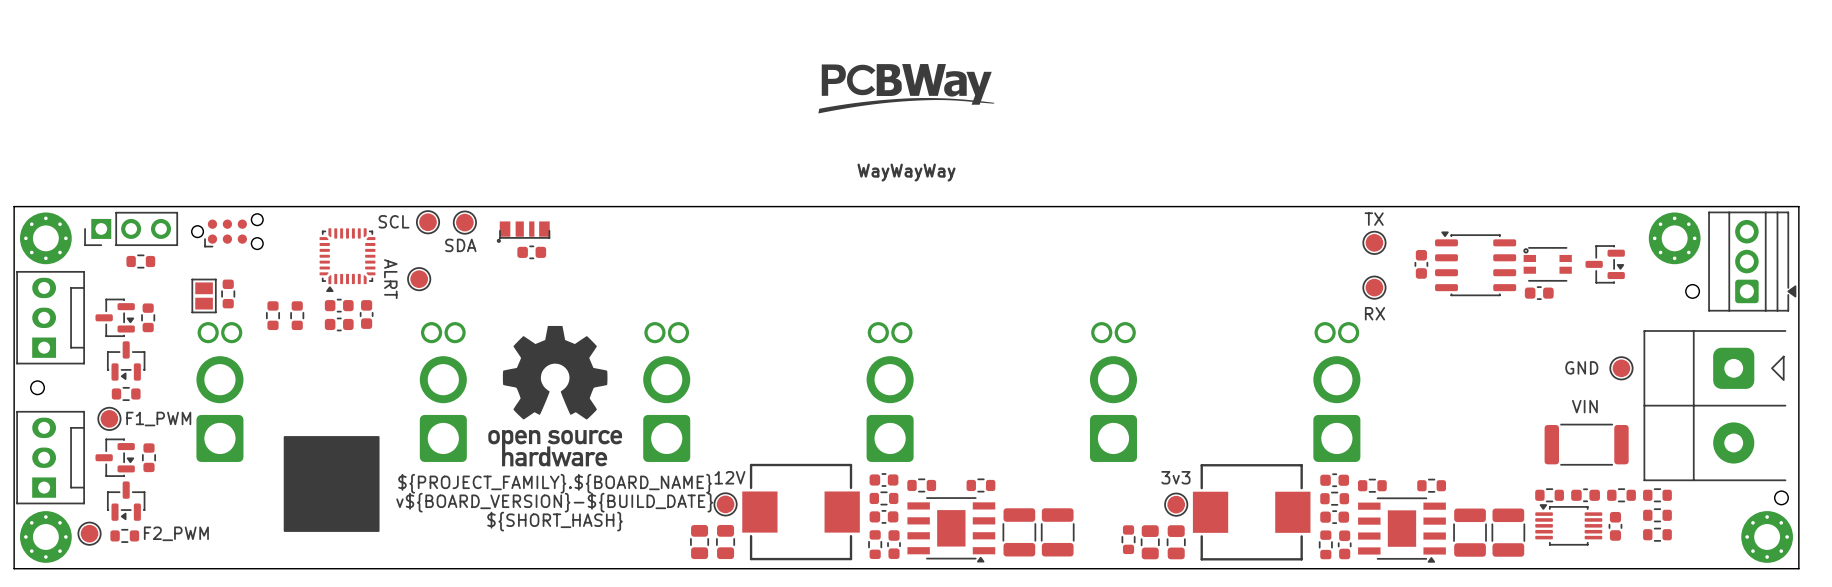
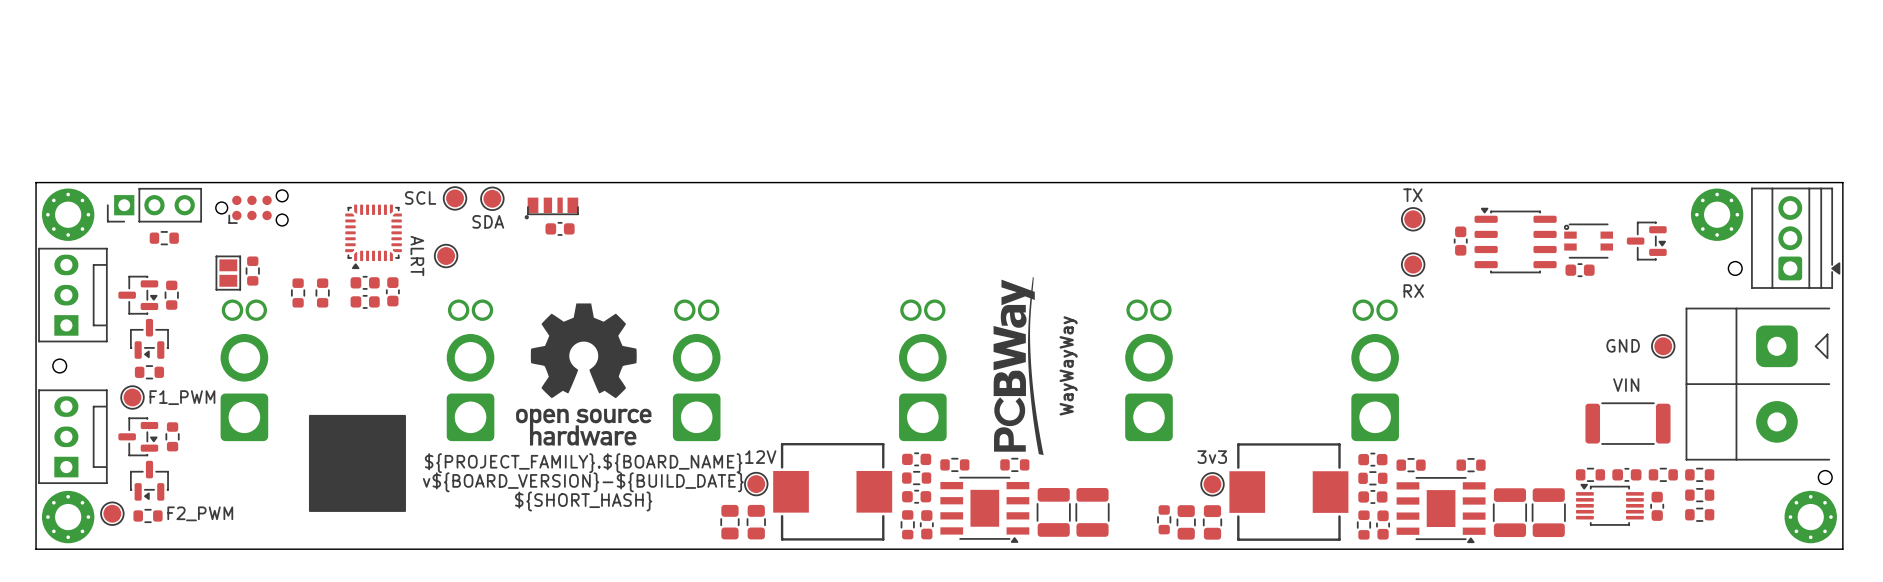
drawing: [818, 64, 995, 114] -> none
text rotation: 0° (906, 172) -> 90° counterclockwise (1068, 365)
text position: WayWayWay (906, 172) -> WayWayWay (1068, 365)
drawing: none -> [993, 276, 1044, 456]

